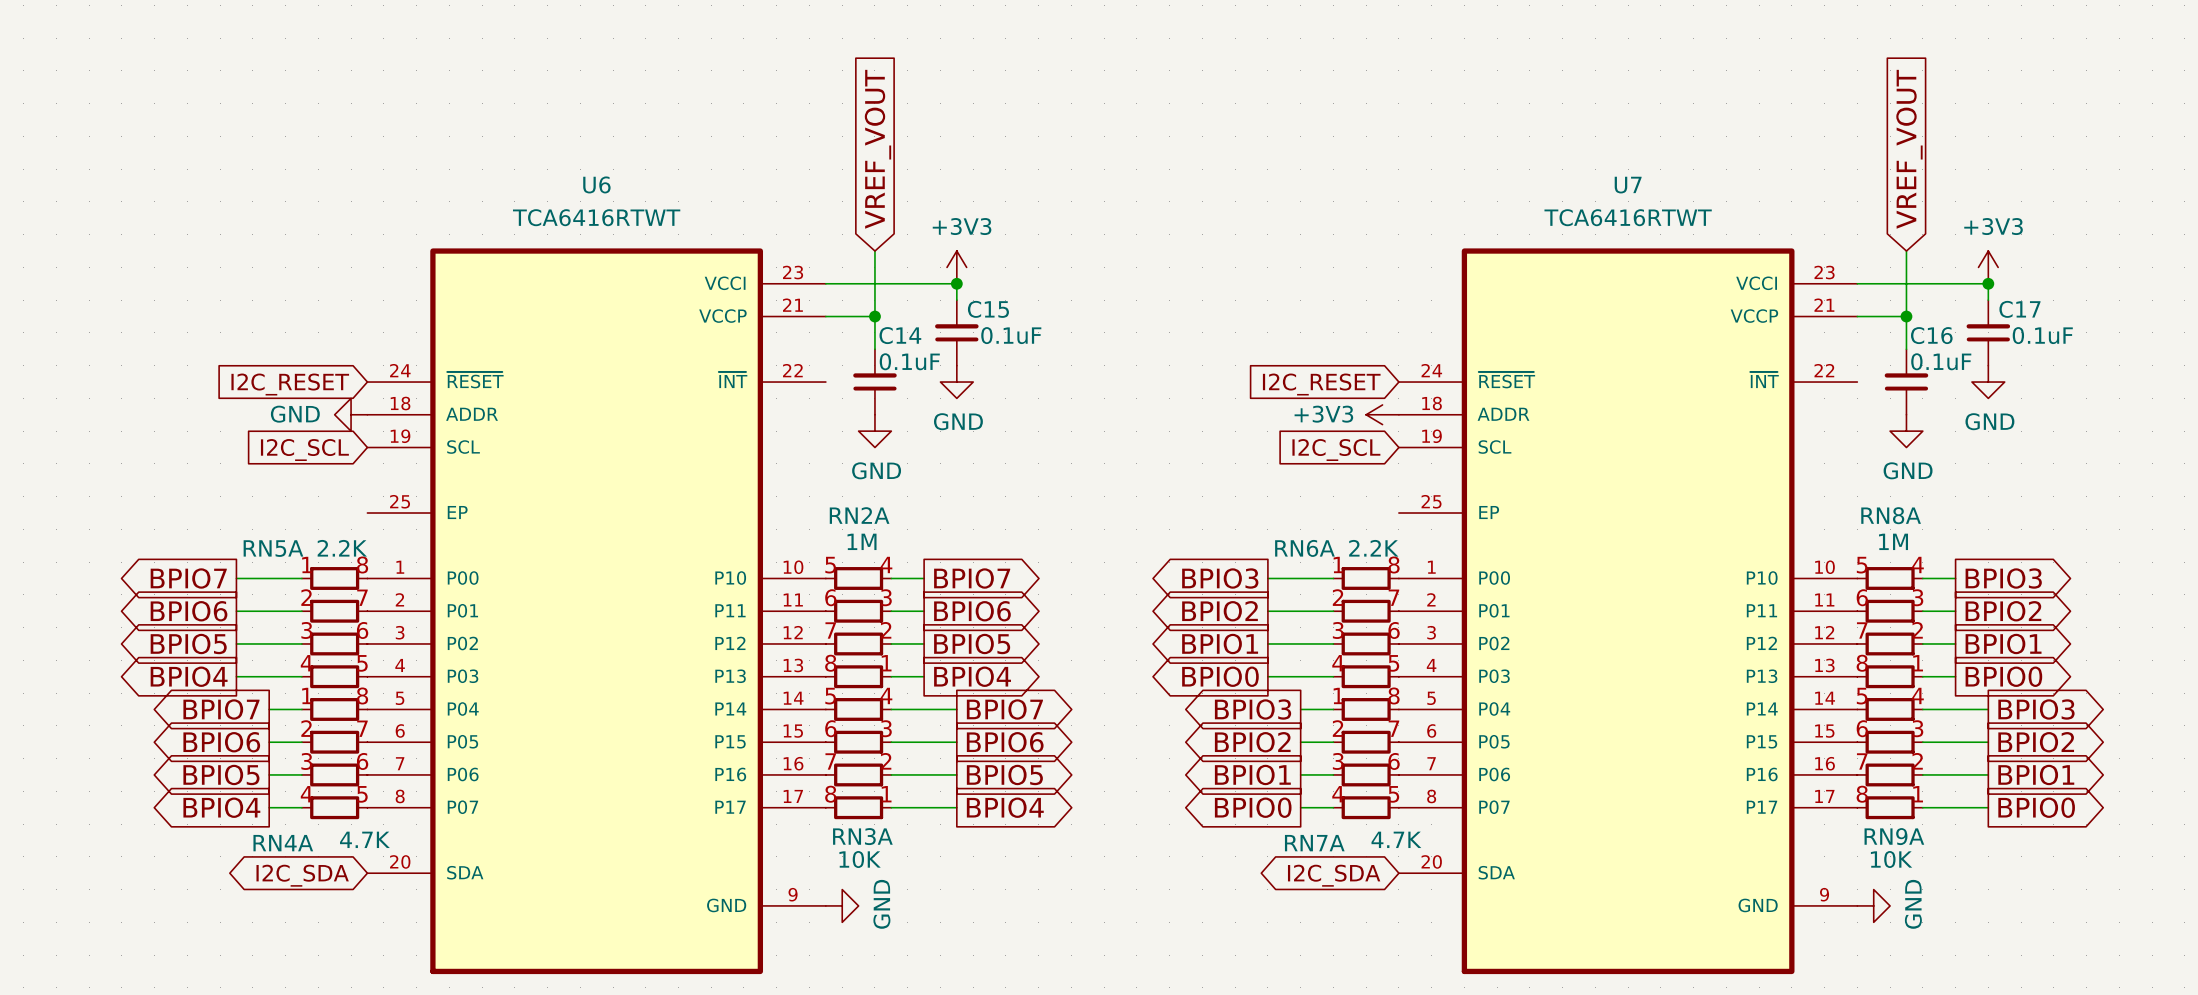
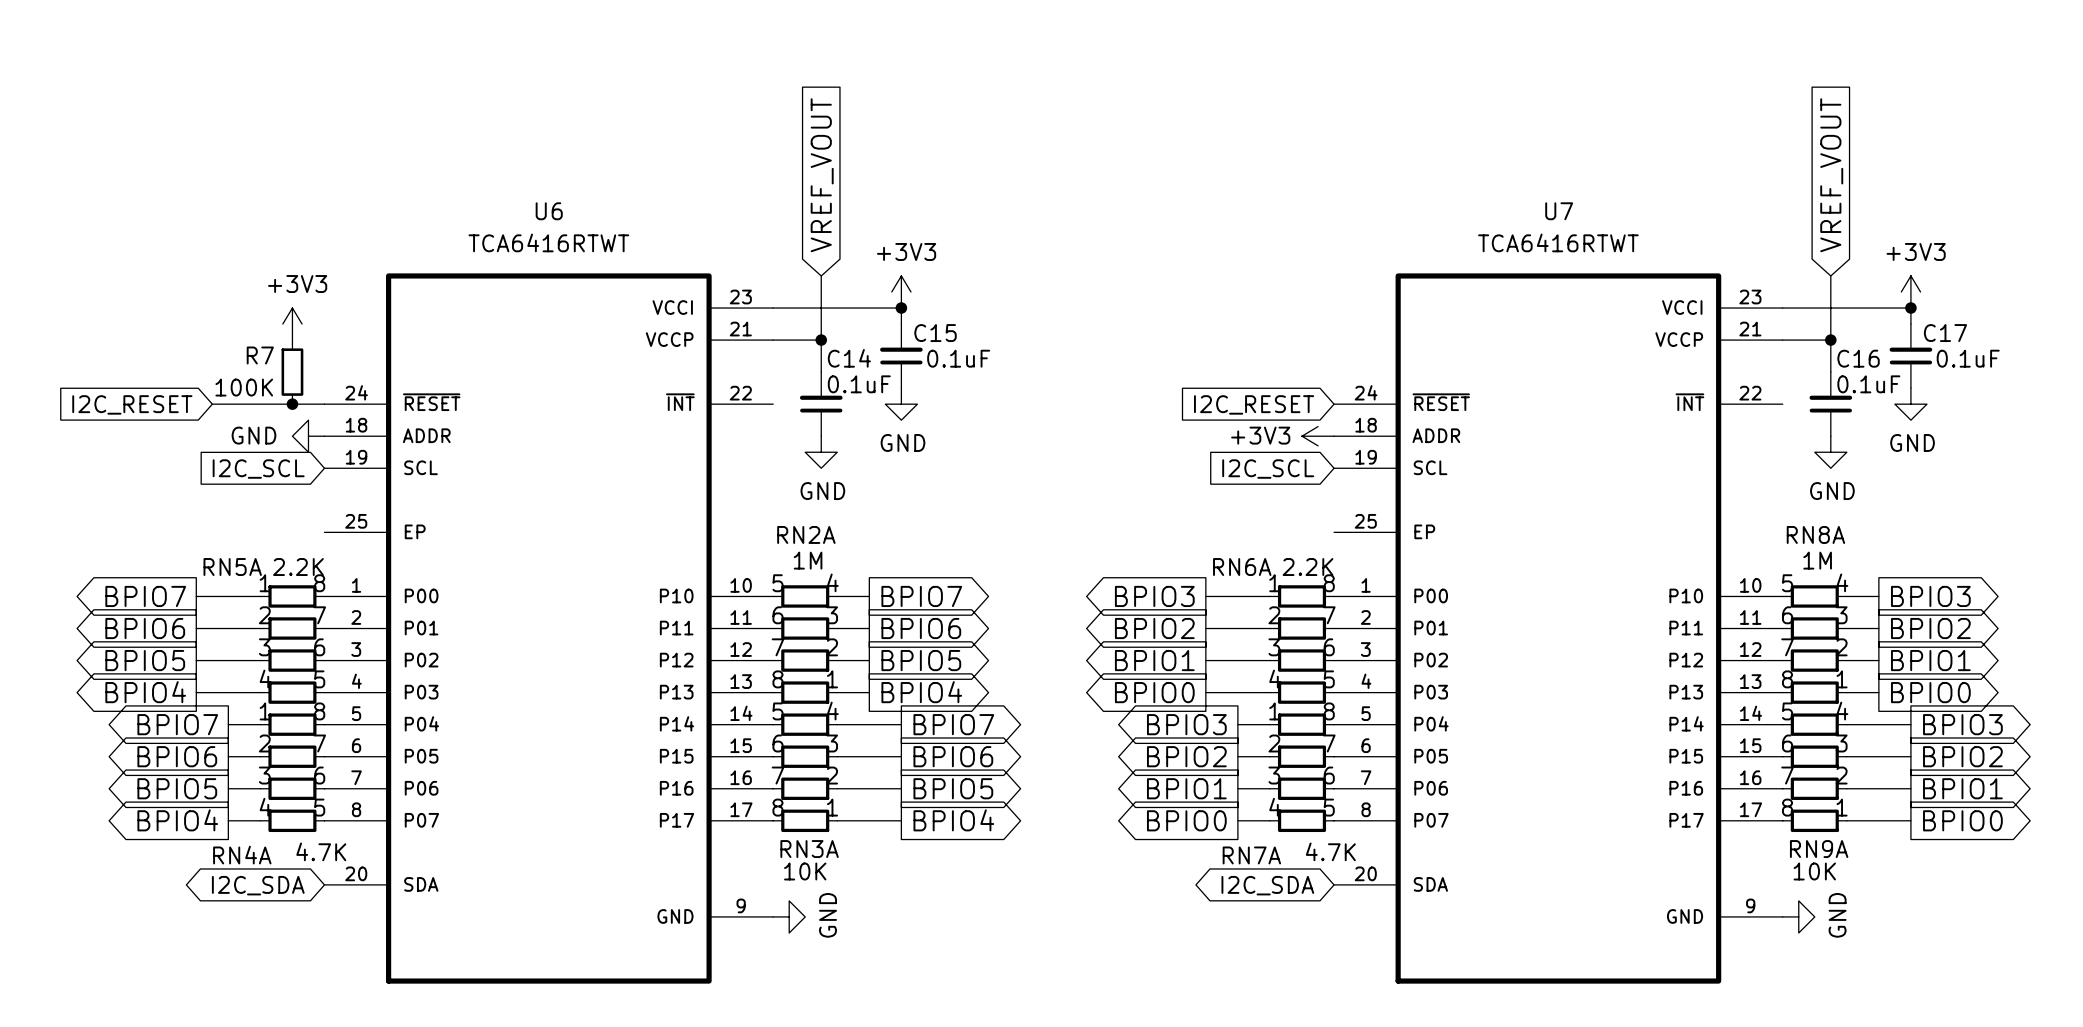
power symbol: none -> +3V3 (292, 324)
R7: none -> 100K (292, 372)
wire: none -> (212, 404) (324, 404)
junction: none -> (292, 404)
global label position: I2C_RESET (290, 384) -> I2C_RESET (132, 404)

